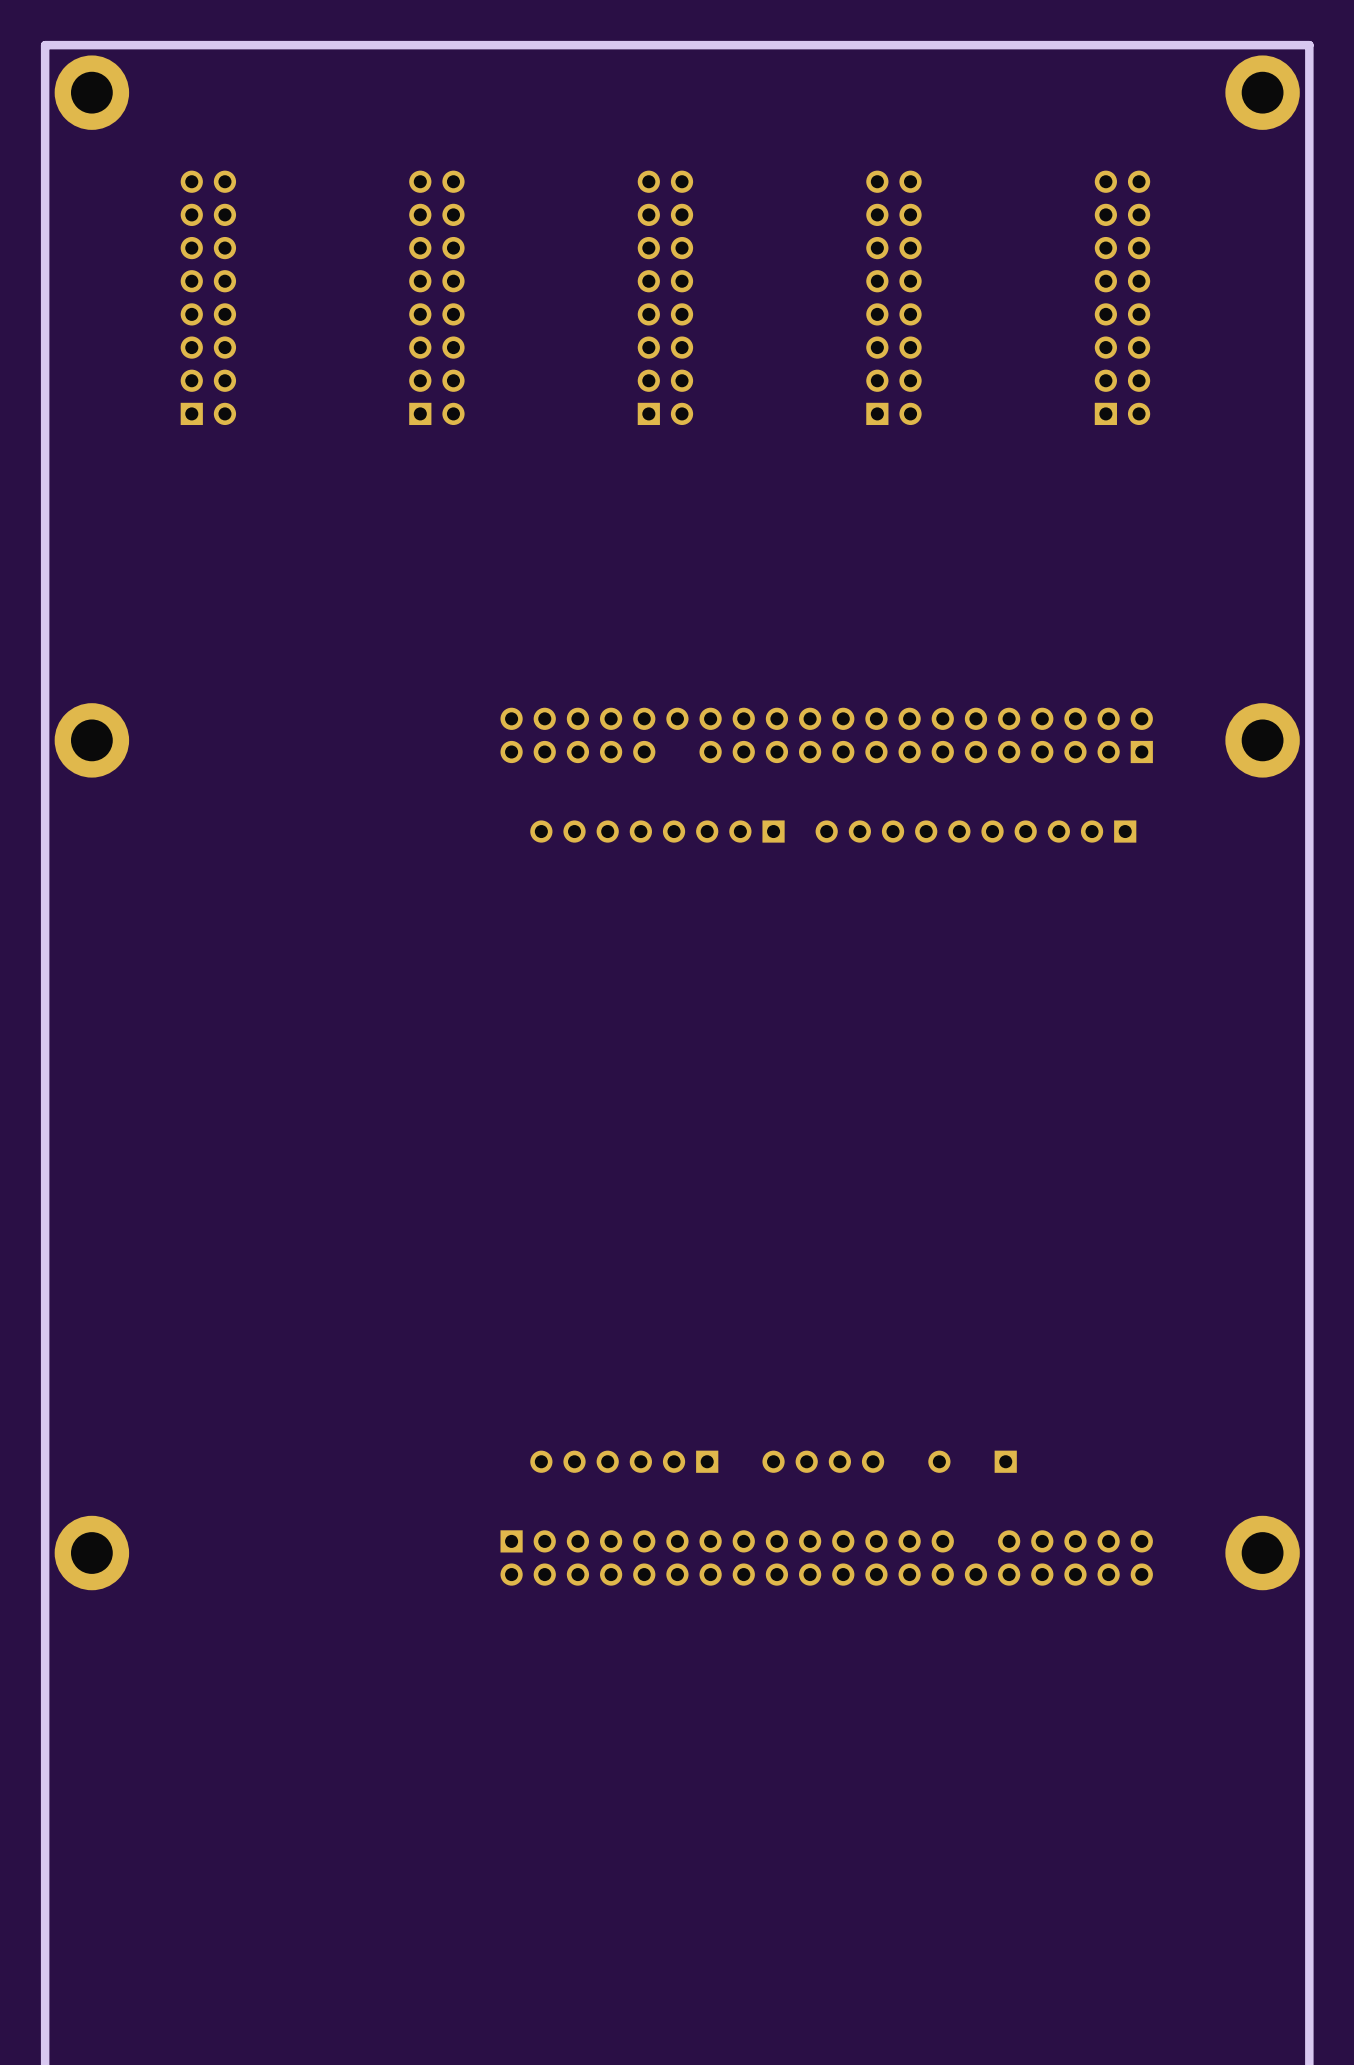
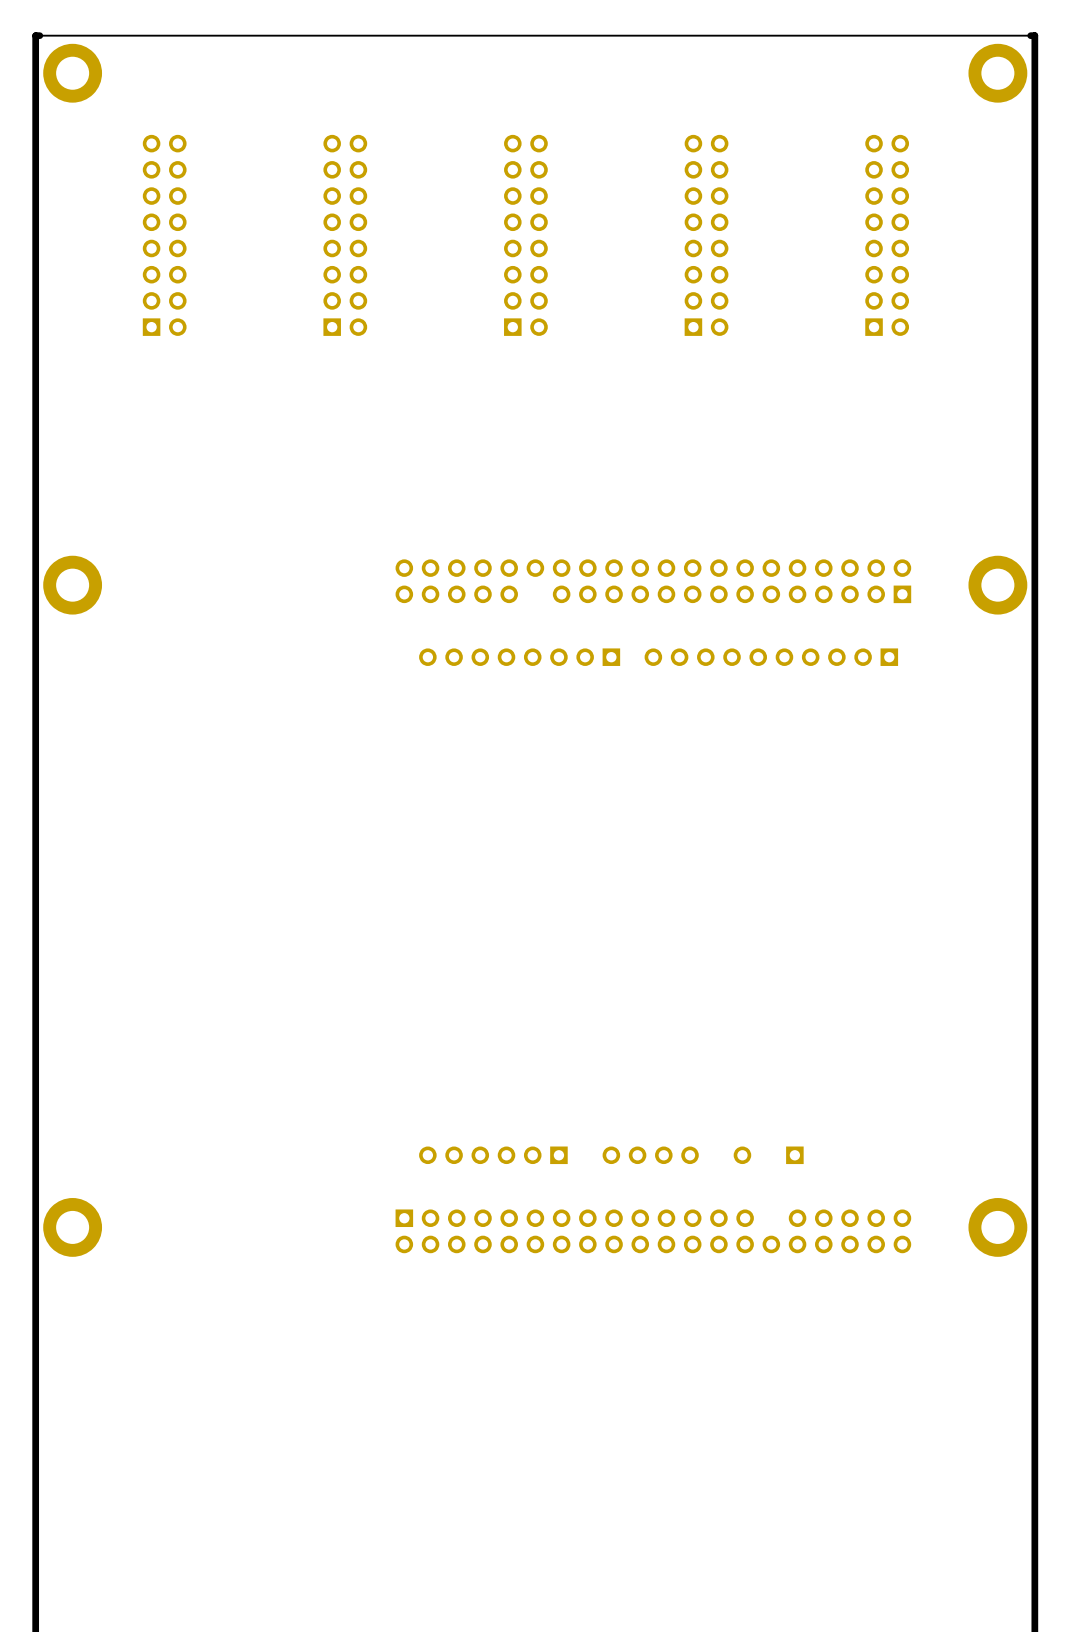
board edge width: thick (1304, 45) (50, 45) -> thin (1030, 35) (39, 35)

